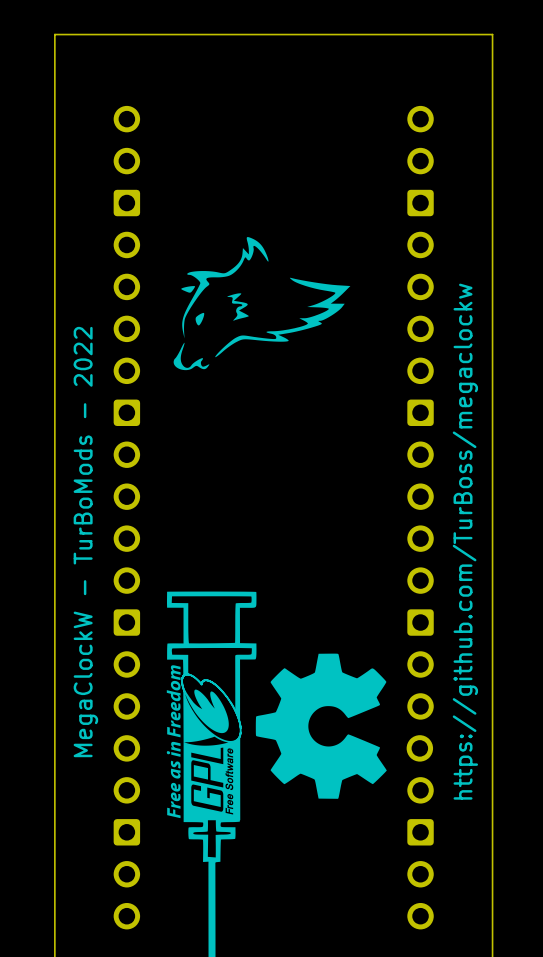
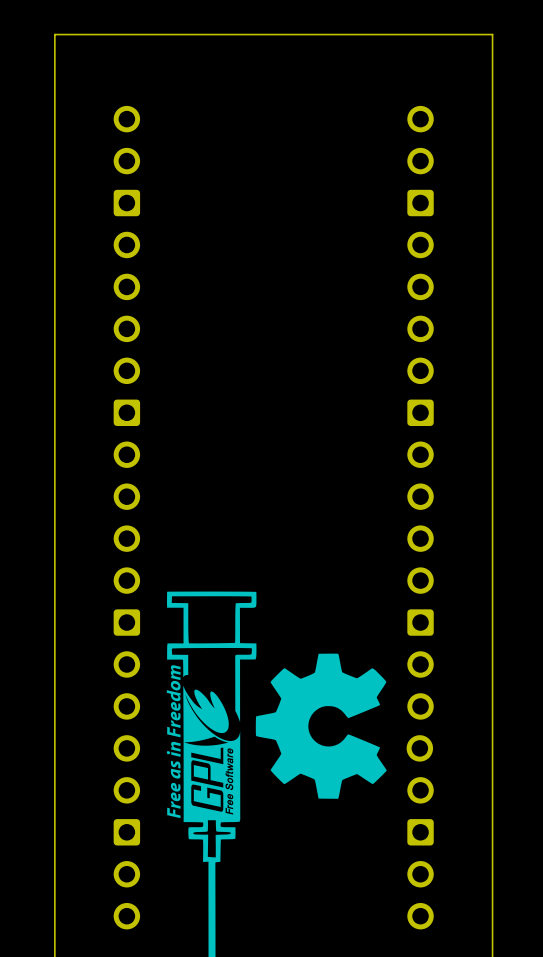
drawing: [173, 237, 351, 371] -> none
text: https://github.com/TurBoss/megaclockw (465, 541) -> none
text: MegaClockW - TurBoMods - 2022 (85, 542) -> none
line: (185, 674) (193, 676) (201, 684) -> none
line: (182, 679) (185, 693) -> none
line: (203, 680) (208, 680) (216, 685) (233, 707) (240, 727) (240, 735) (236, 740) -> none

